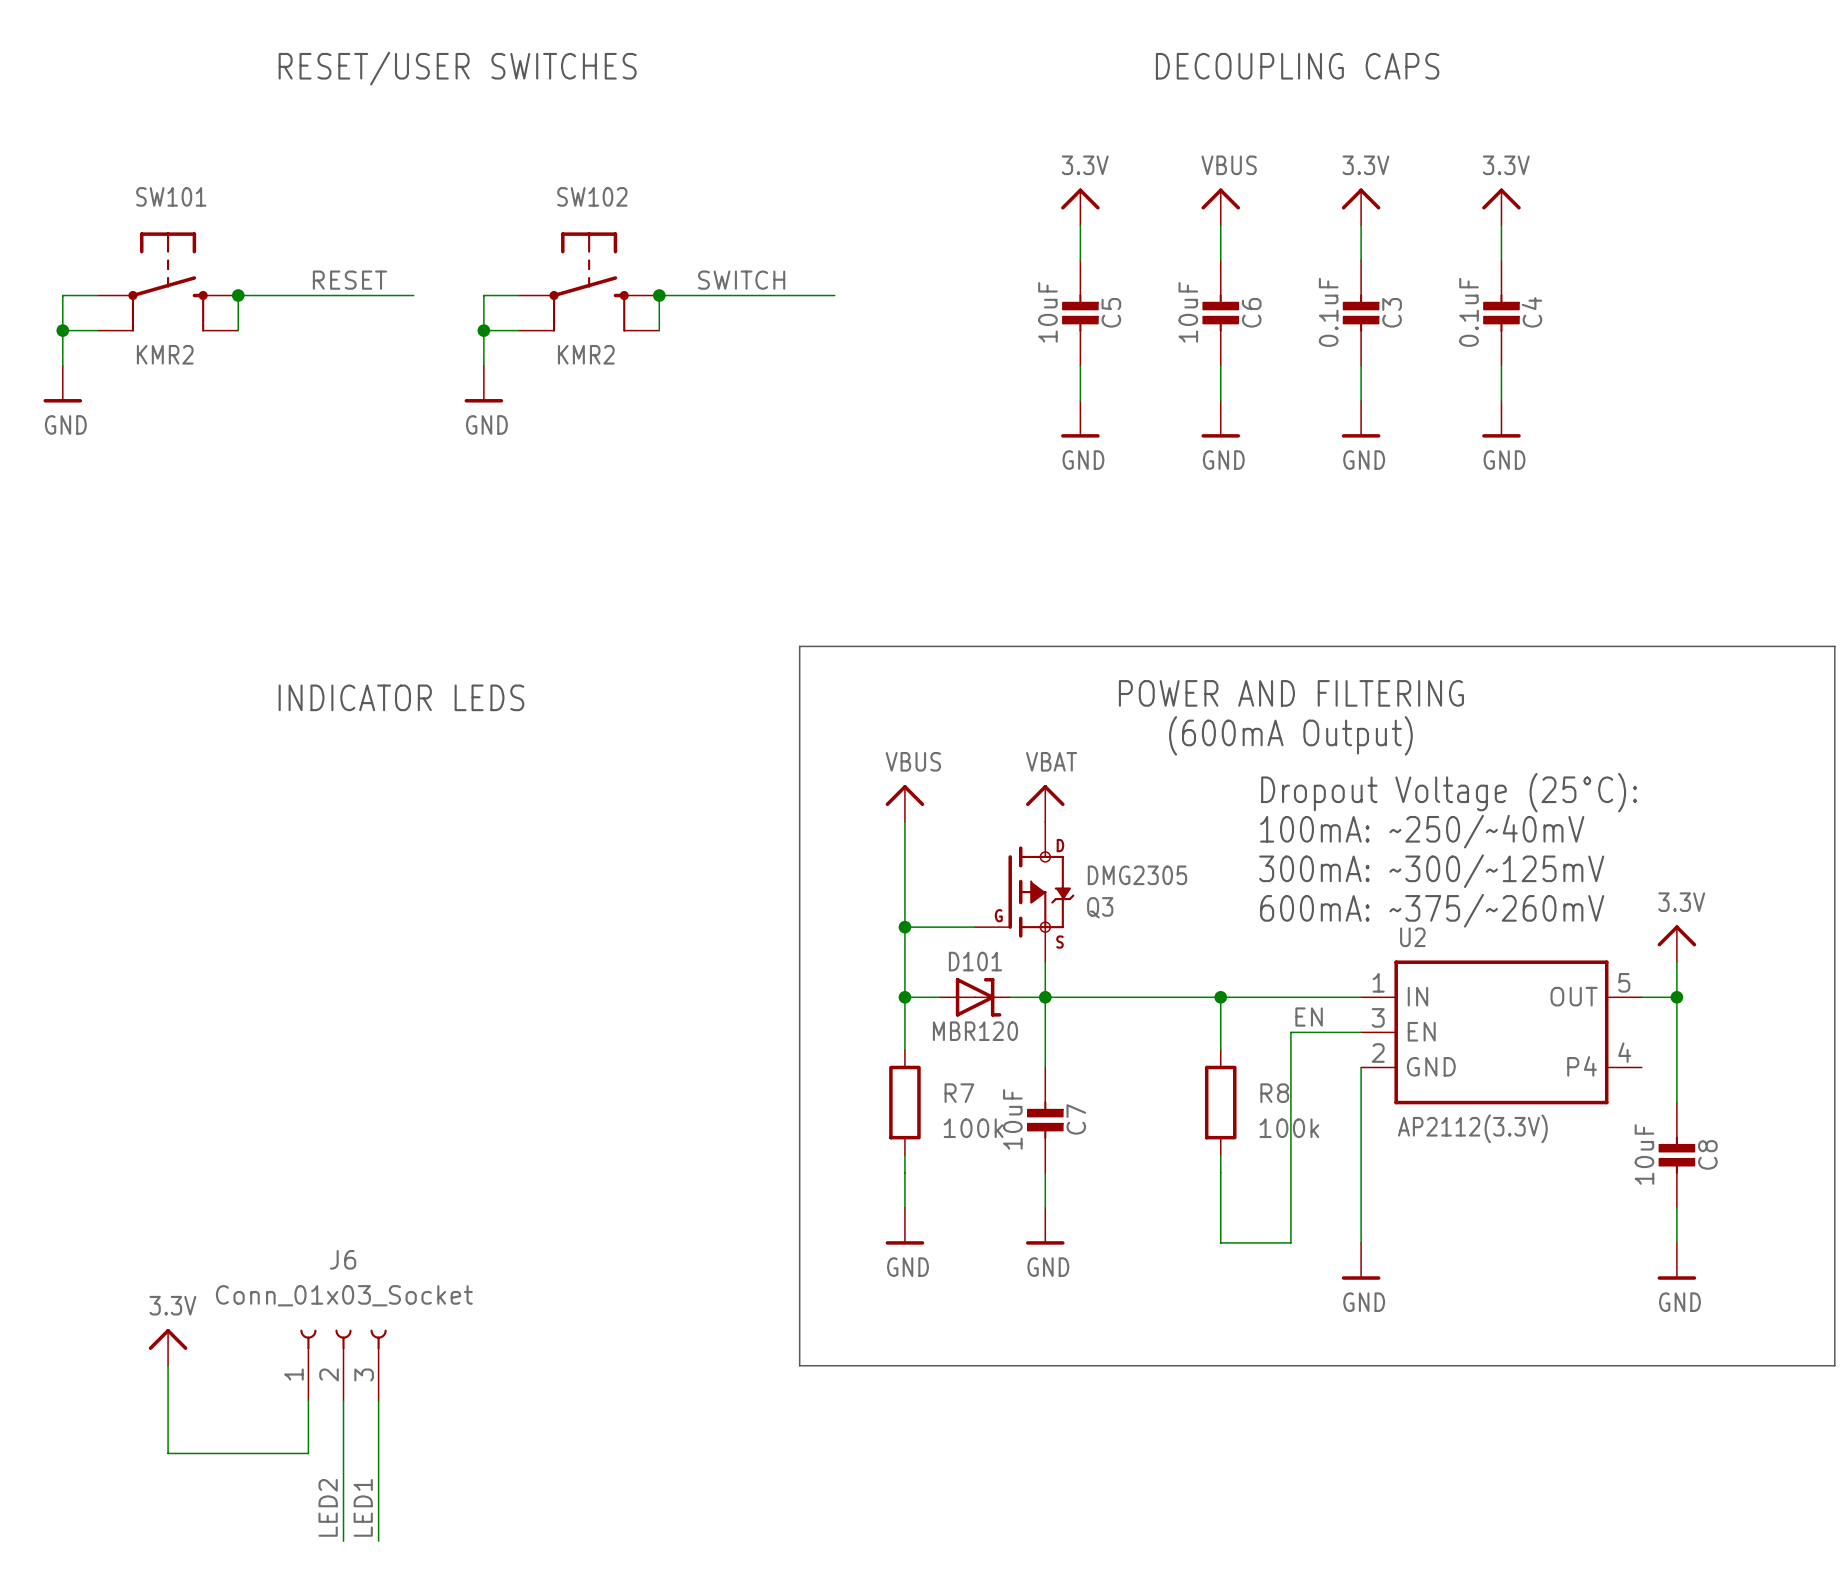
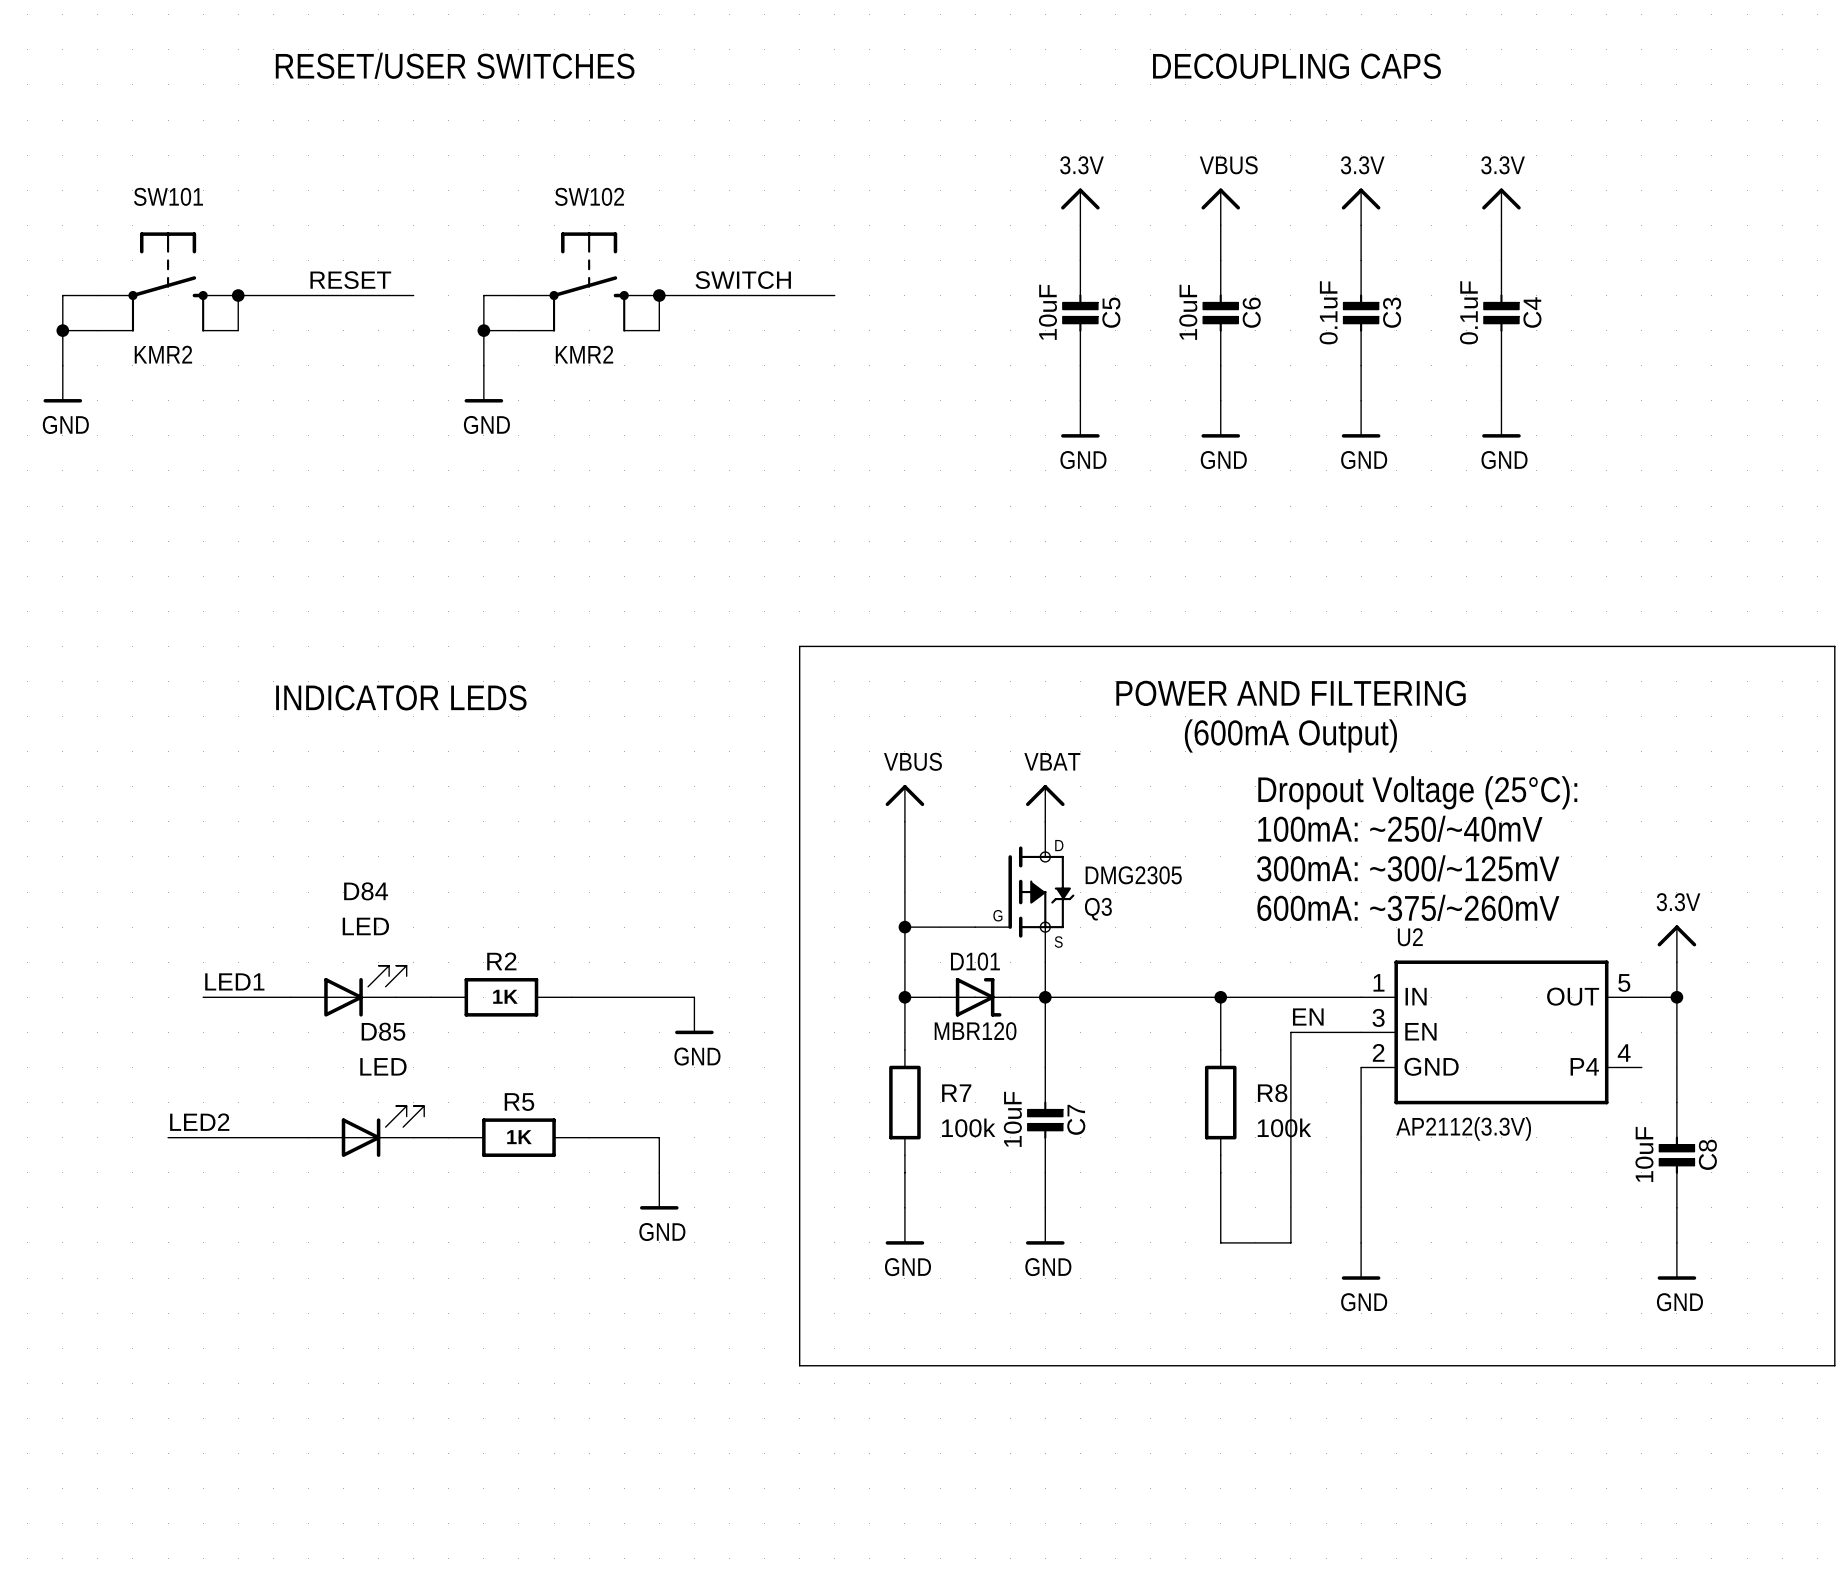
label: none -> LED1 (234, 981)
D84: none -> LED (348, 991)
wire: none -> (203, 997) (290, 997)
wire: none -> (396, 997) (431, 997)
R2: none -> 1K (501, 997)
wire: none -> (571, 997) (694, 997)
power symbol: none -> GND (694, 1015)
label: none -> LED2 (199, 1122)
D85: none -> LED (366, 1131)
wire: none -> (168, 1137) (308, 1137)
wire: none -> (413, 1137) (448, 1137)
R5: none -> 1K (518, 1137)
wire: none -> (589, 1137) (659, 1137) (659, 1172)
power symbol: none -> GND (659, 1191)
power symbol: 3.3V (168, 1347) -> none
wire: (168, 1365) (168, 1453) (308, 1453) (308, 1400) -> none
J6: Conn_01x03_Socket (343, 1365) -> none
wire: (343, 1400) (343, 1541) -> none
wire: (378, 1400) (378, 1541) -> none
label: LED2 (328, 1507) -> none
label: LED1 (363, 1507) -> none

